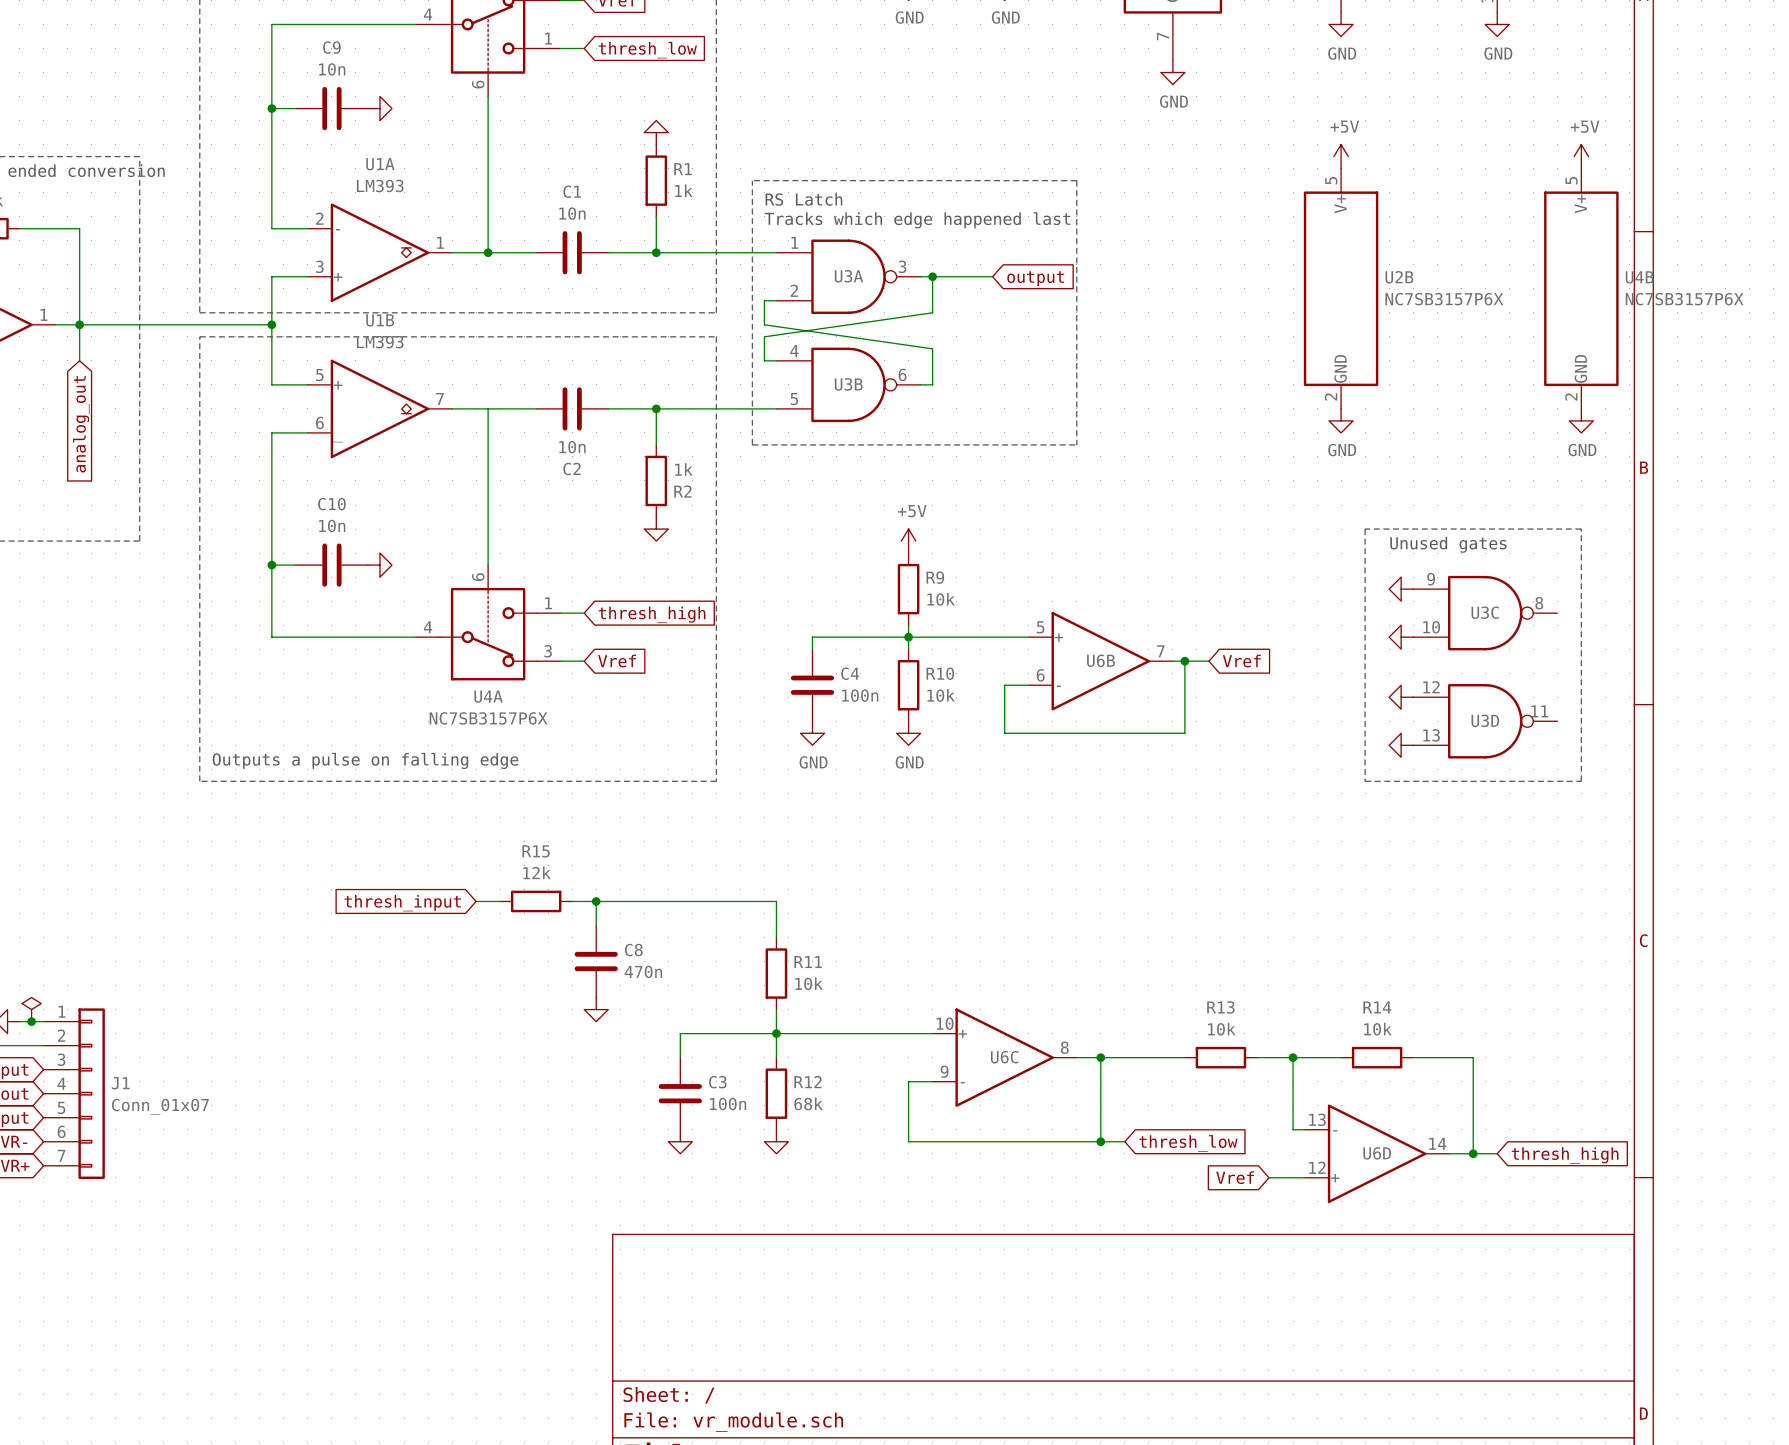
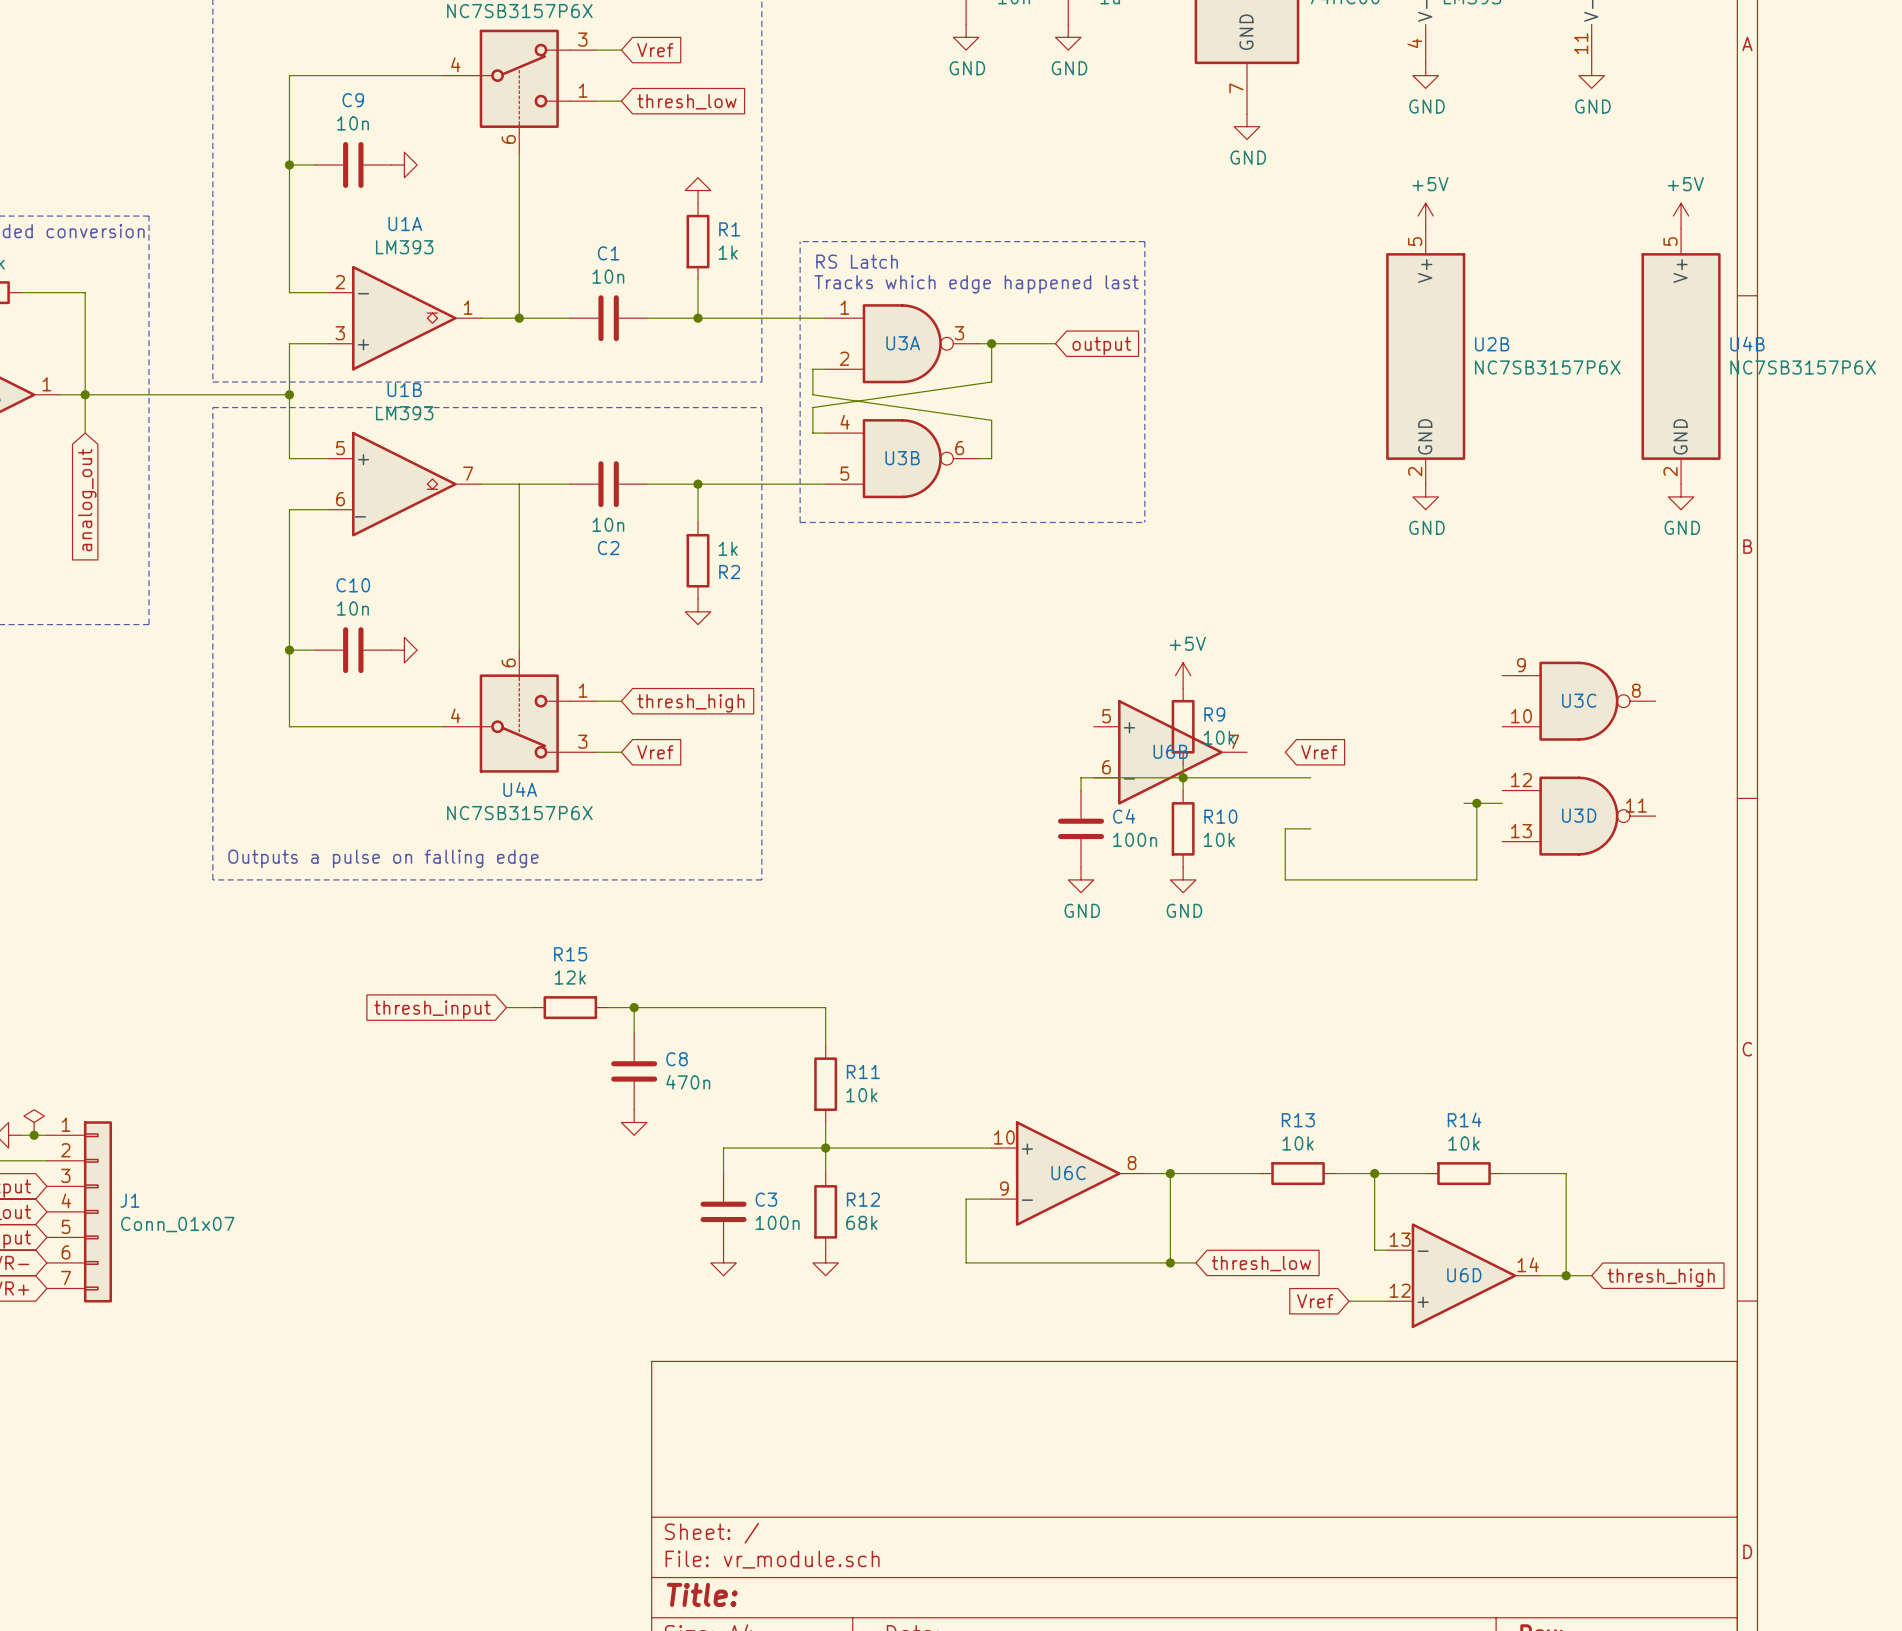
line: (1365, 529) (1365, 781) (1581, 781) (1581, 529) (1365, 529) -> none
power symbol position: +5V (908, 541) -> +5V (1183, 675)
text: Unused gates (1448, 544) -> none
R9 position: (908, 589) -> (1183, 726)
power symbol: (1401, 589) -> none
wire: (908, 625) (908, 649) -> (1183, 765) (1183, 790)
junction: (908, 637) -> none
wire: (1028, 637) (812, 637) (812, 649) -> none
power symbol: (1401, 637) -> none
wire: (1172, 661) (1208, 661) -> (1464, 803) (1502, 803)
wire: (1184, 661) (1184, 733) (1004, 733) (1004, 685) (1016, 685) -> (1081, 790) (1081, 777)
junction: (1184, 661) -> none
C4 position: (812, 685) -> (1081, 828)
R10 position: (908, 685) -> (1183, 828)
wire: none -> (1093, 777) (1310, 777)
junction: none -> (1183, 777)
power symbol: (1401, 697) -> none
wire: none -> (1476, 803) (1476, 879) (1285, 879) (1285, 828) (1310, 828)
junction: none -> (1476, 803)
power symbol: GND (812, 733) -> none
power symbol: GND (908, 733) -> none
power symbol: (1401, 745) -> none
power symbol: none -> GND (1081, 879)
power symbol: none -> GND (1183, 879)

